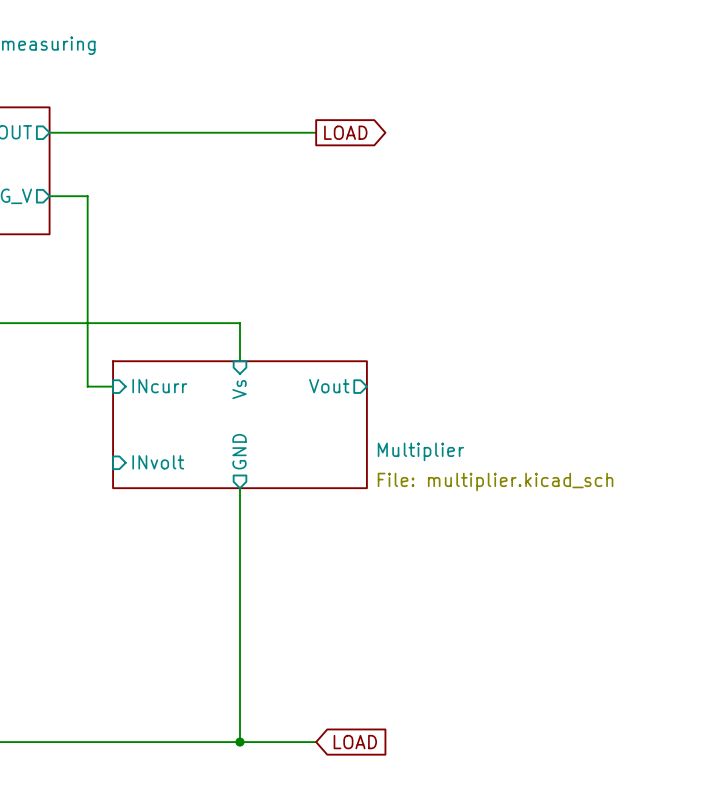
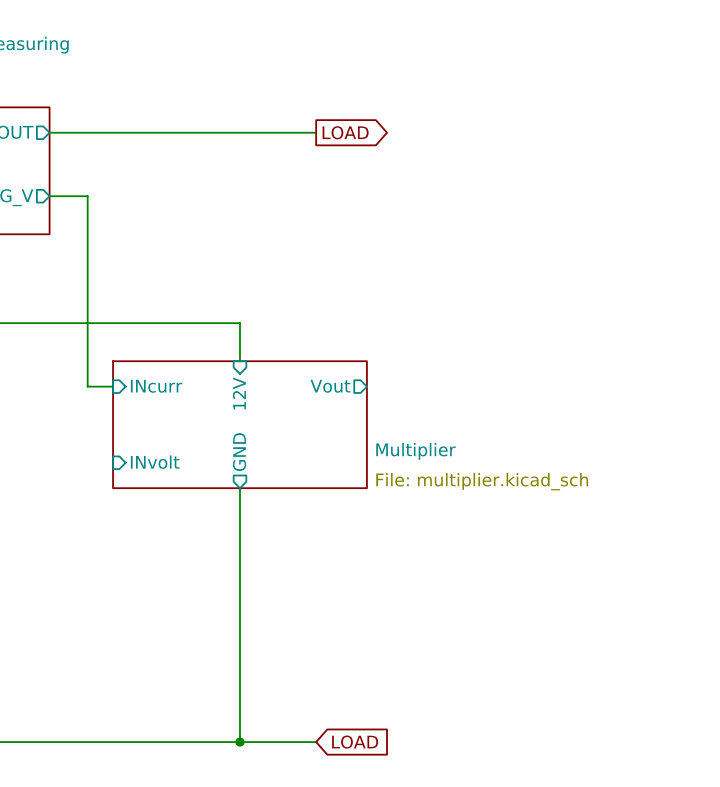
sheet pin: Vs (239, 389) -> 12V (239, 393)

